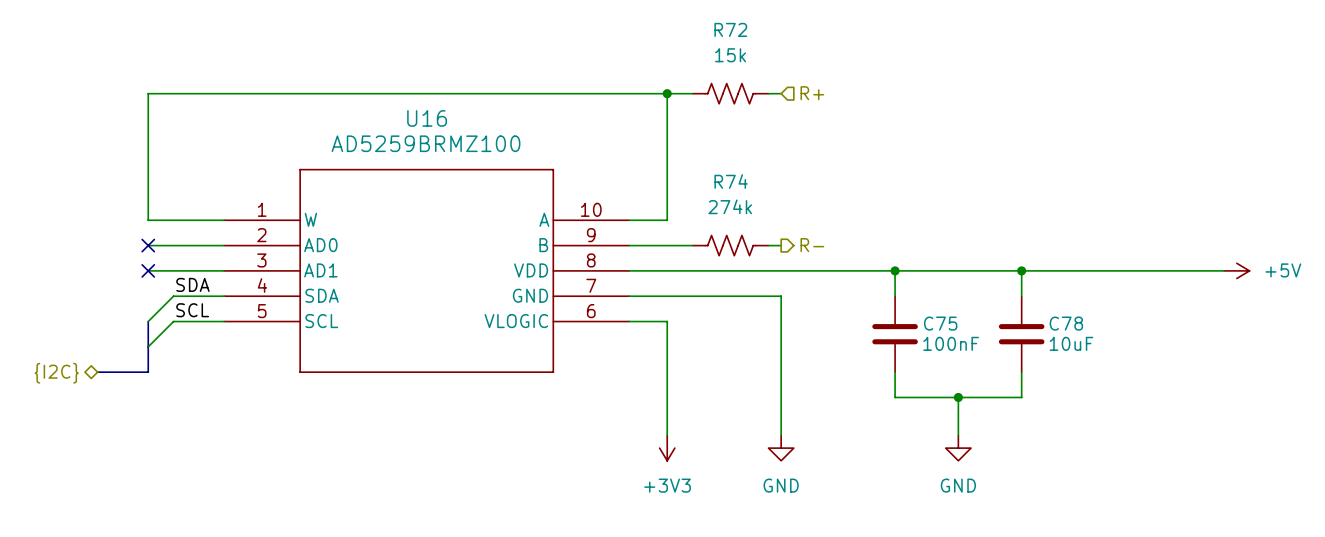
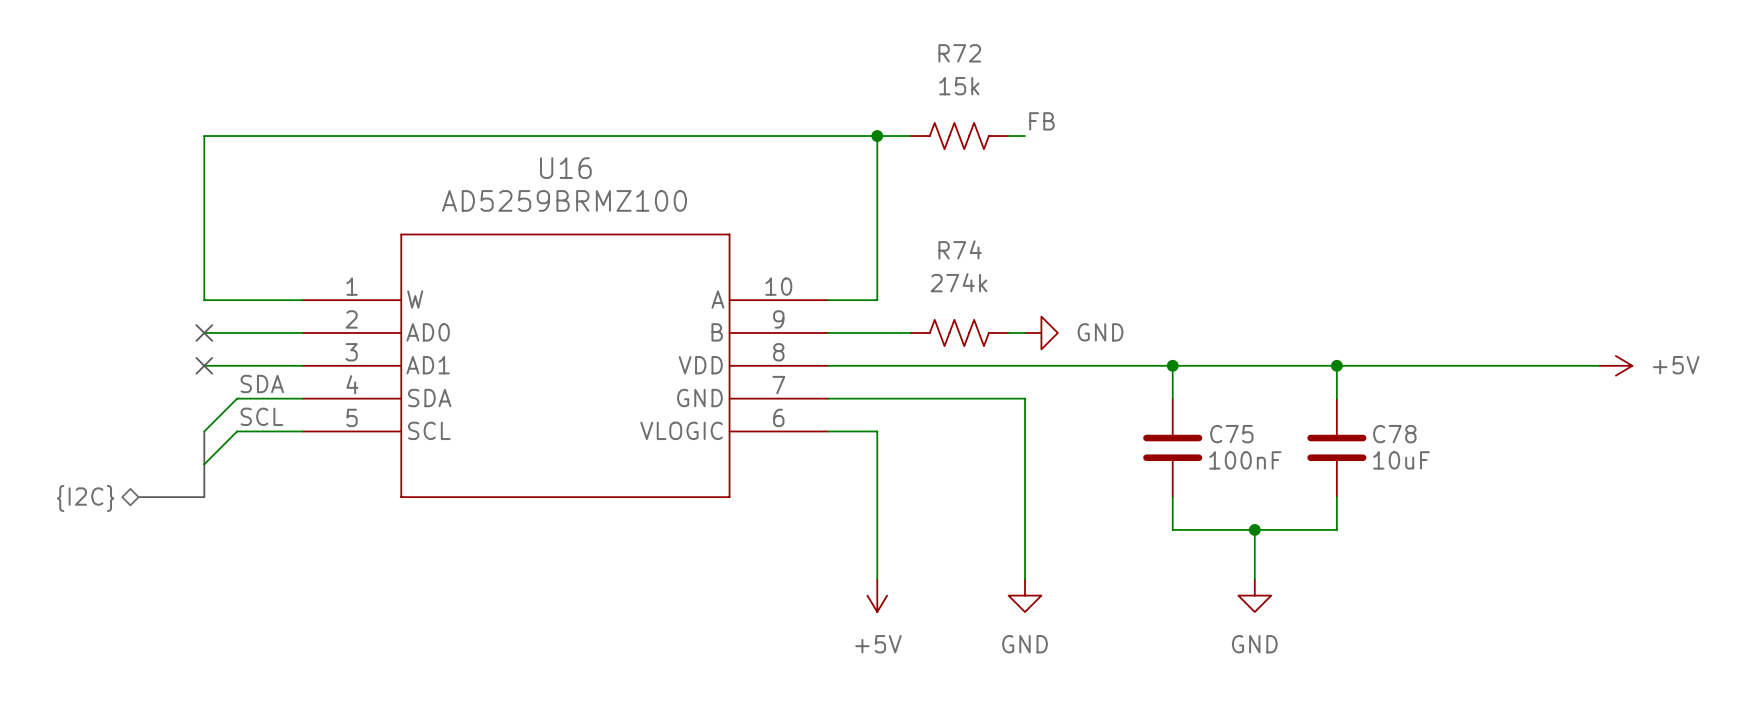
label: none -> FB (1041, 121)
hierarchical label: R+ (812, 93) -> none
power symbol: none -> GND (1041, 332)
hierarchical label: R- (812, 245) -> none
power symbol: +3V3 (667, 448) -> +5V (877, 595)

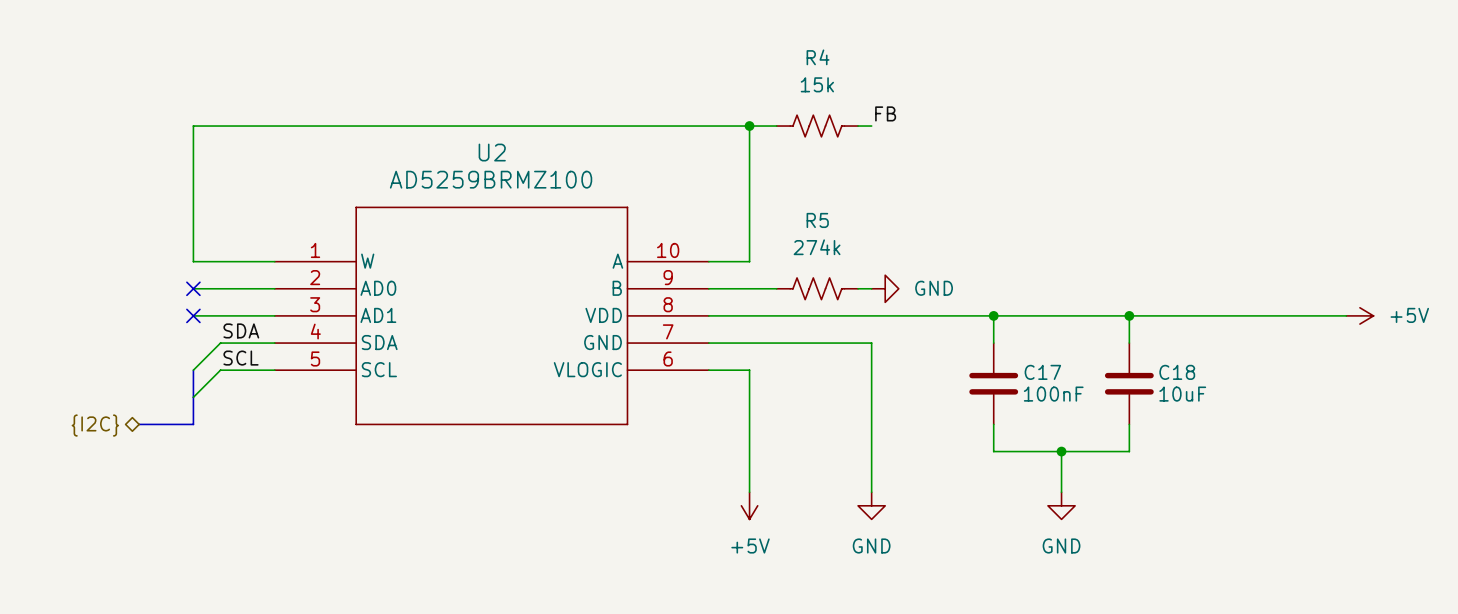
R72 name: R72 (959, 53) -> R4 (818, 57)
U16 name: U16 (565, 168) -> U2 (492, 152)
R74 name: R74 (960, 249) -> R5 (817, 220)
C75 name: C75 (1231, 434) -> C17 (1042, 372)
C78 name: C78 (1394, 434) -> C18 (1177, 372)

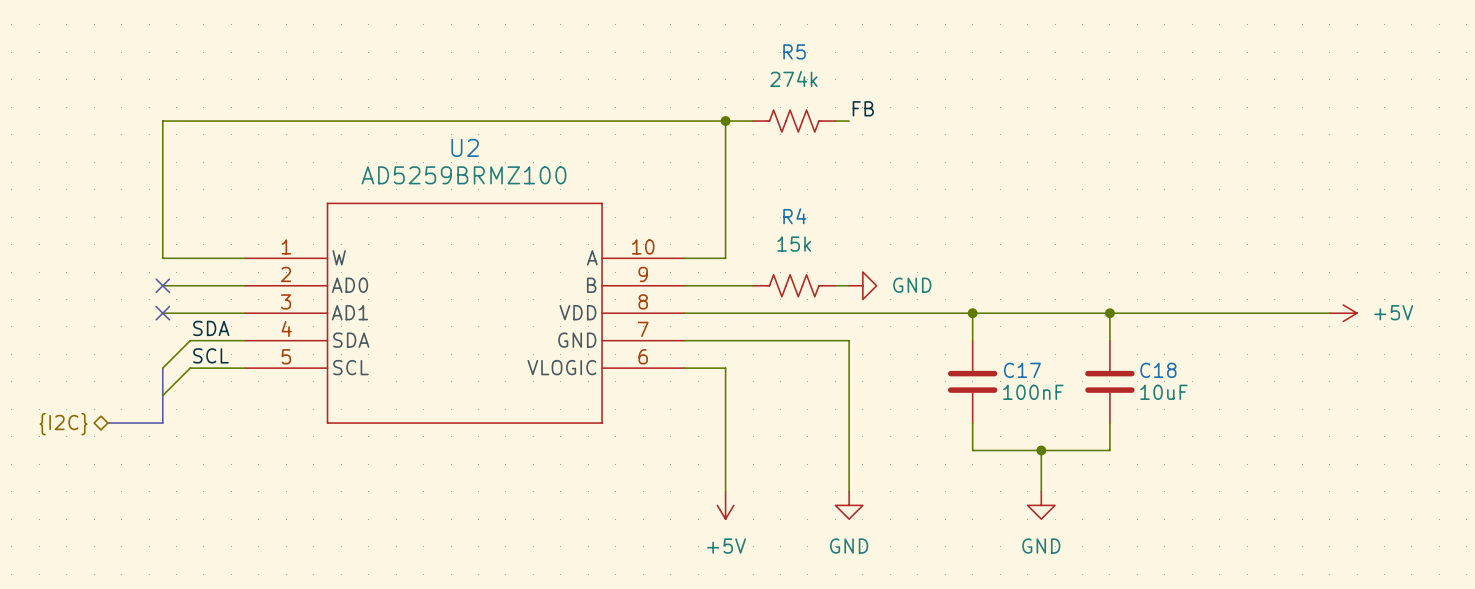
R4 name: R4 (818, 57) -> R5 (794, 51)
R4 value: 15k (817, 84) -> 274k (793, 79)
R5 name: R5 (817, 220) -> R4 (794, 216)
R5 value: 274k (817, 247) -> 15k (794, 244)

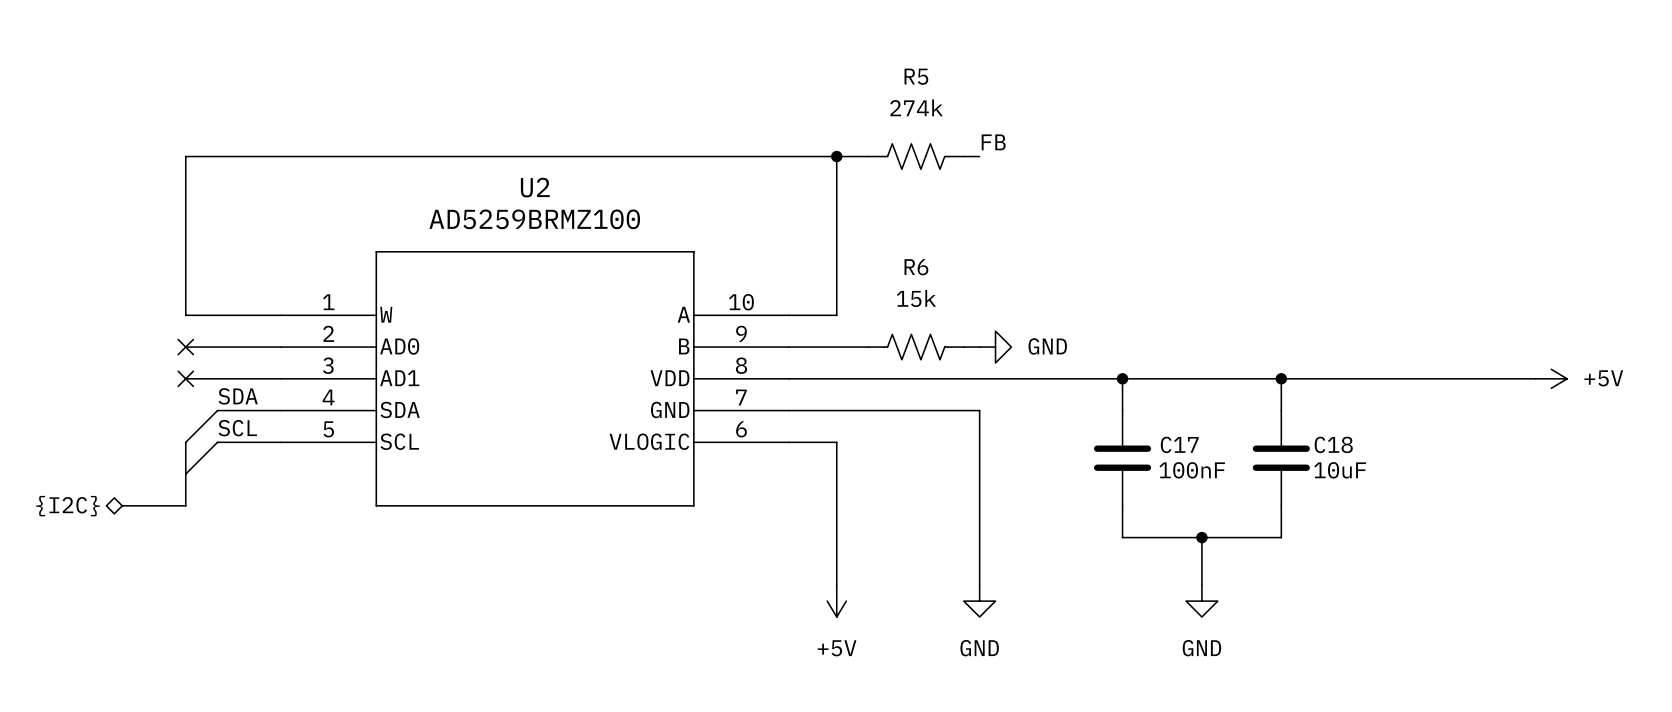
R4 name: R4 (794, 216) -> R6 (916, 267)

